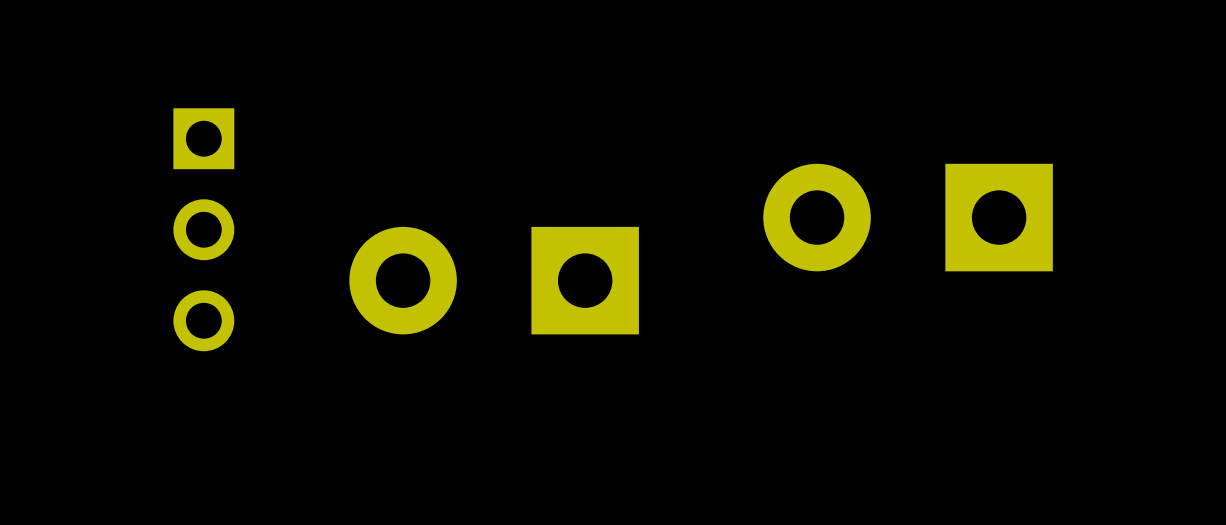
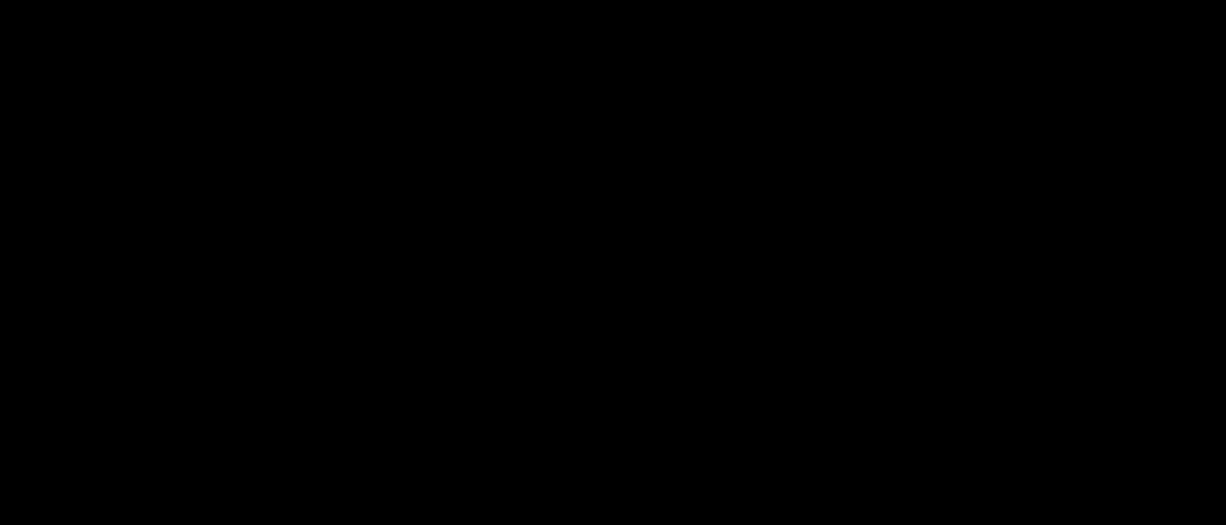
part: (908, 217) -> none
part: (203, 229) -> none
part: (494, 280) -> none

